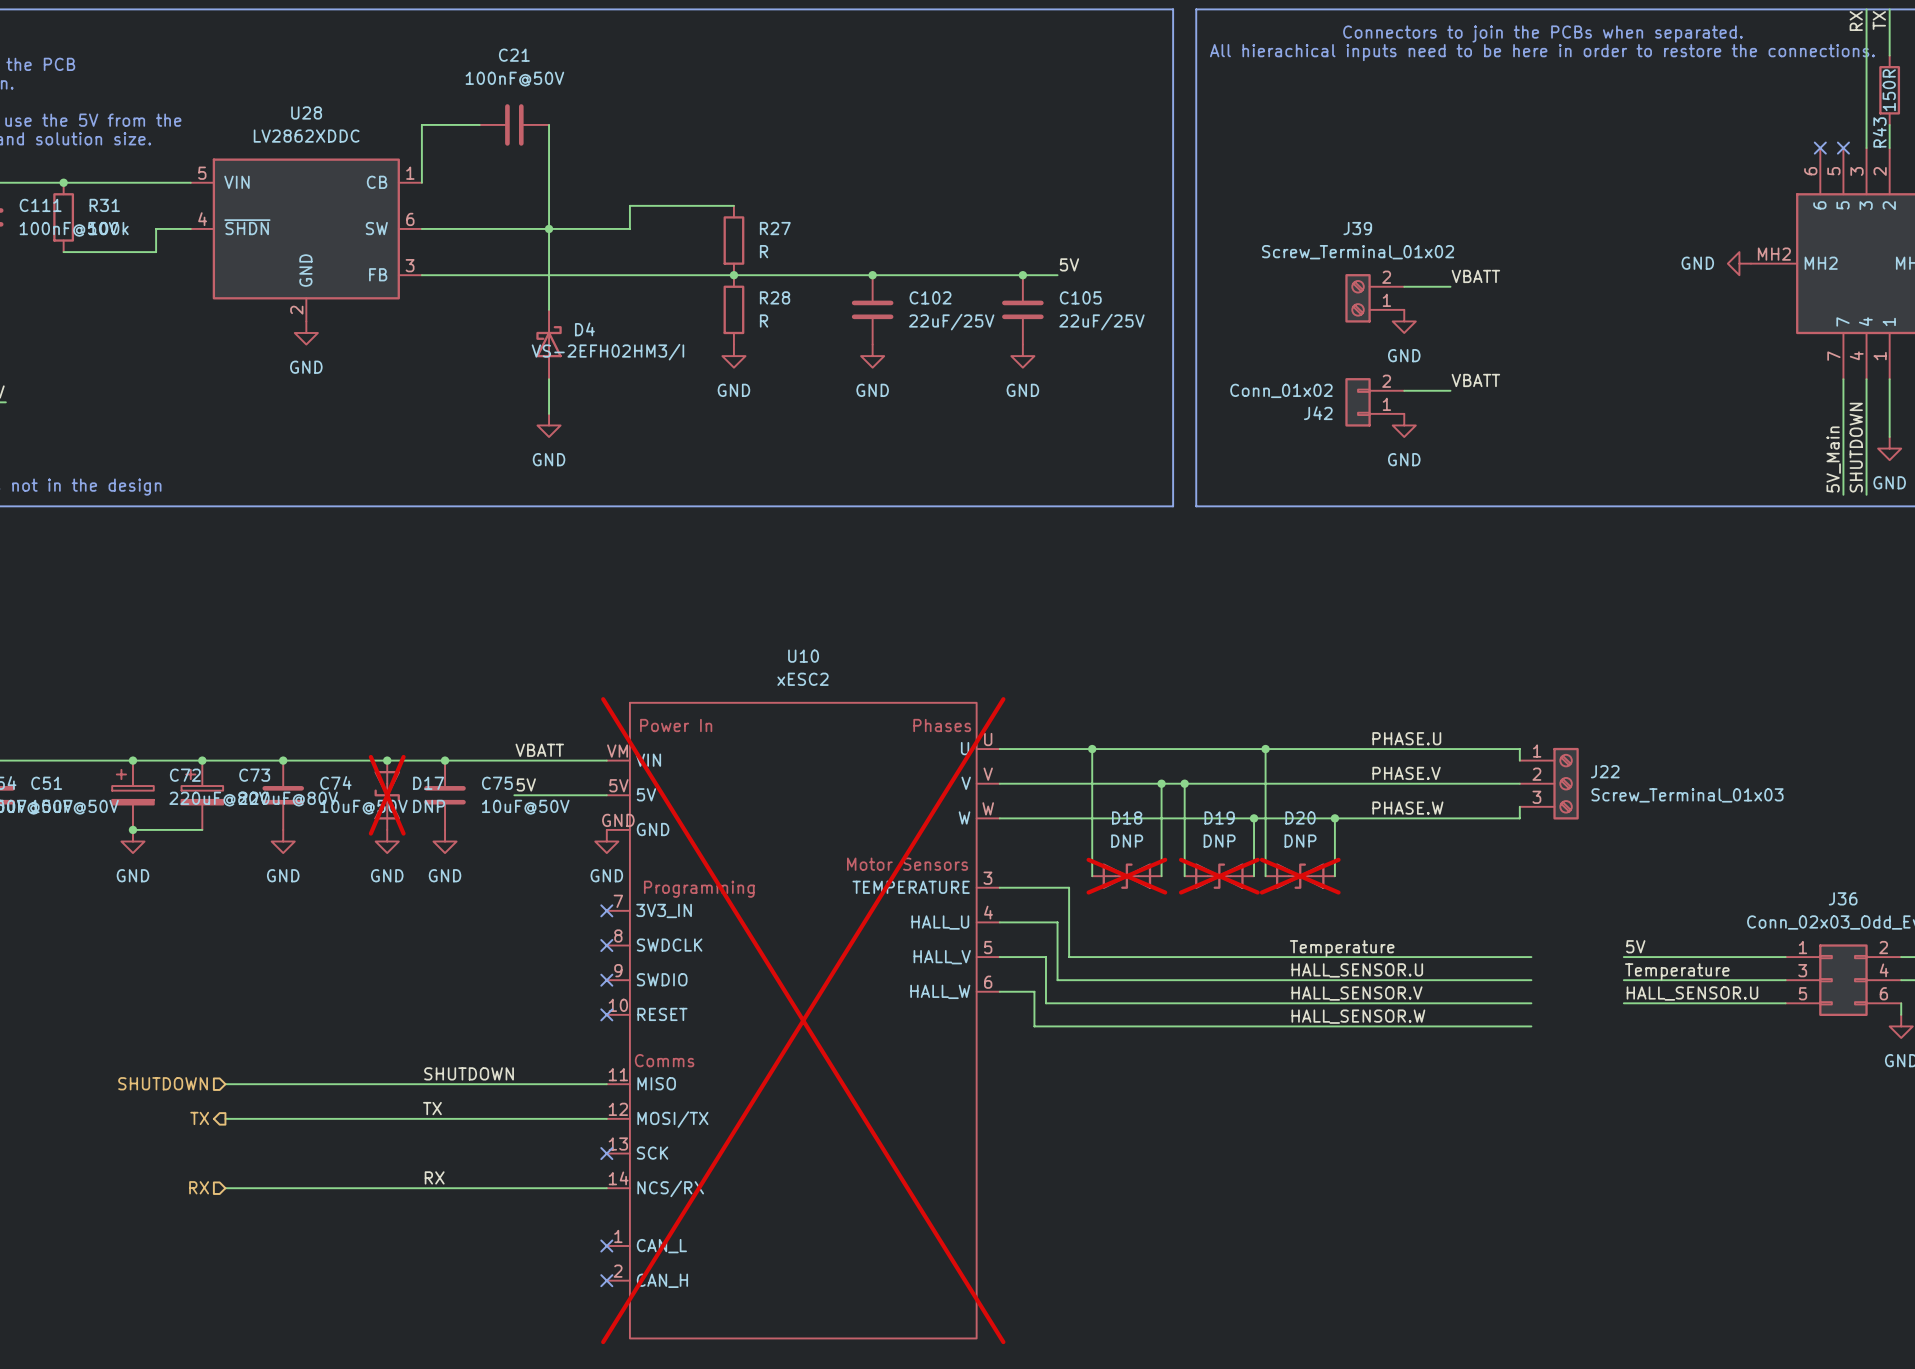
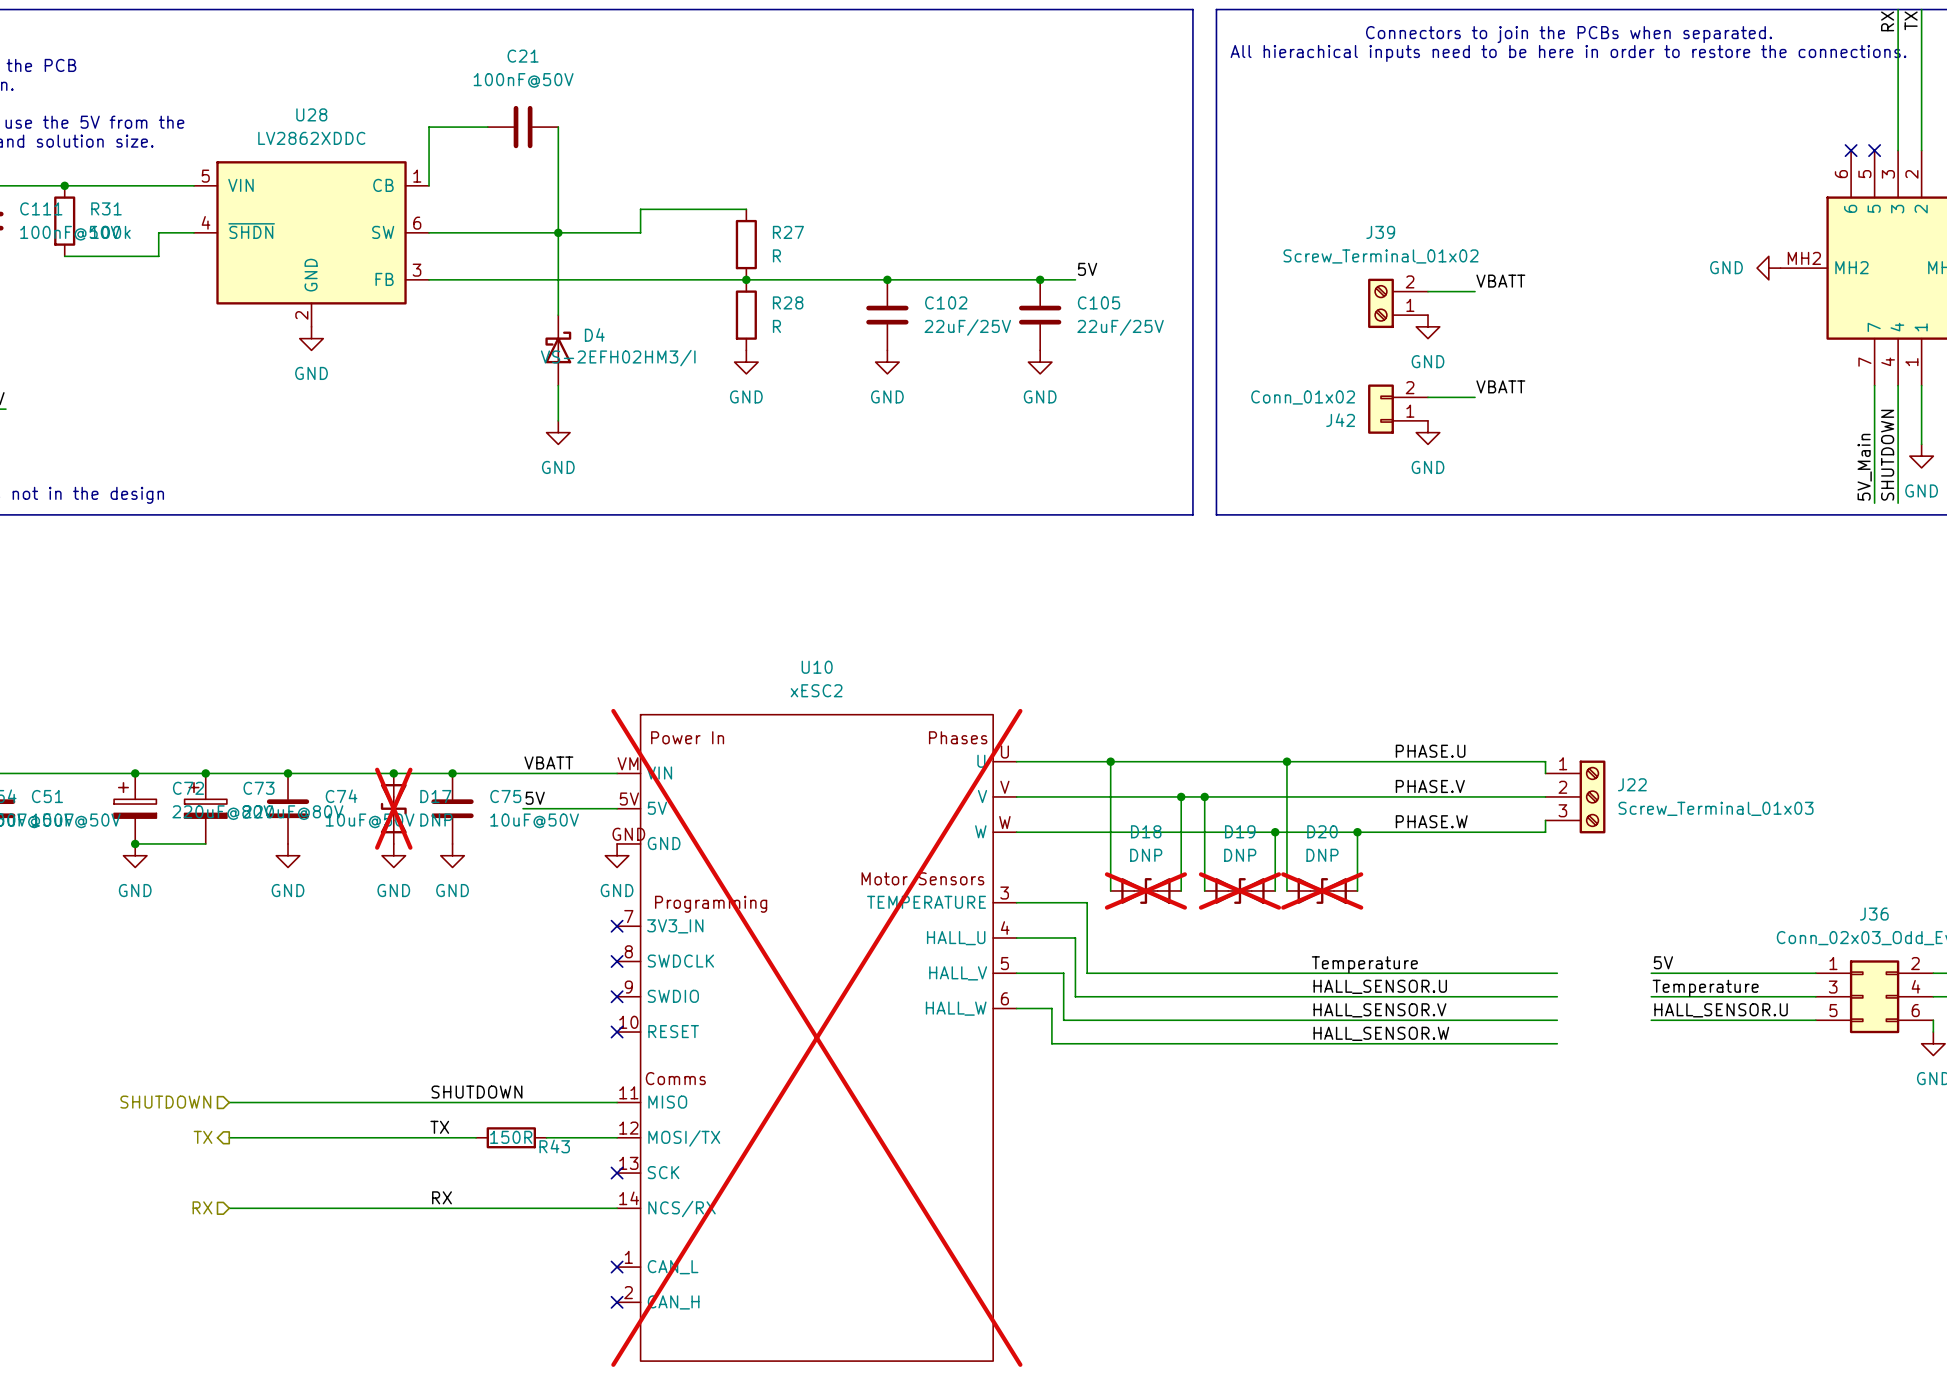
R43 rotation: 0° (1889, 90) -> 90° clockwise (511, 1137)
R43 position: (1889, 90) -> (511, 1137)
R43 name position: R43 (1879, 132) -> R43 (554, 1146)

